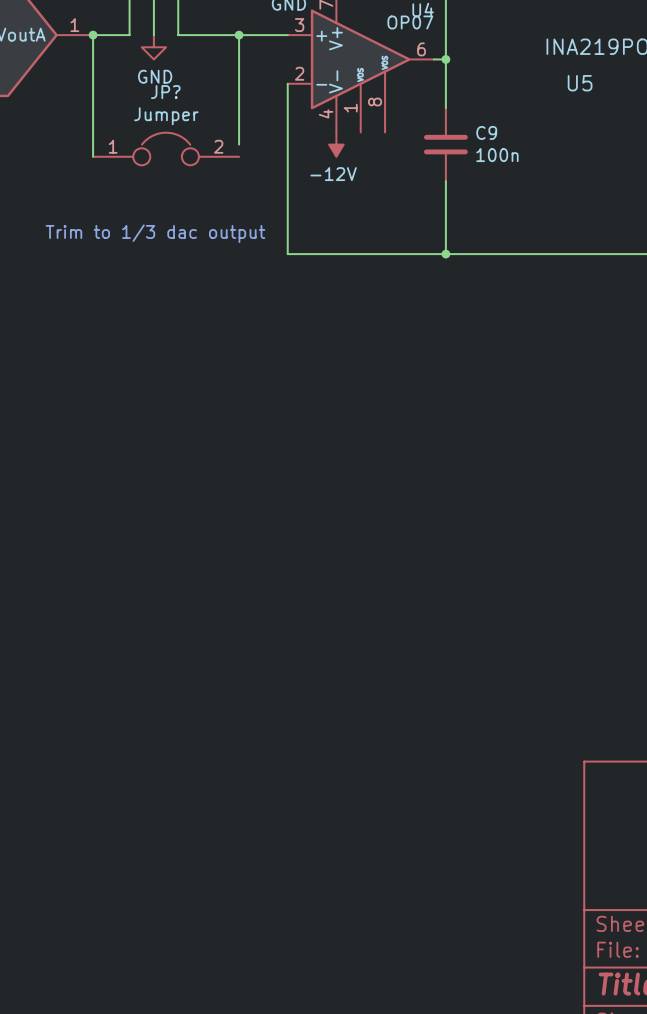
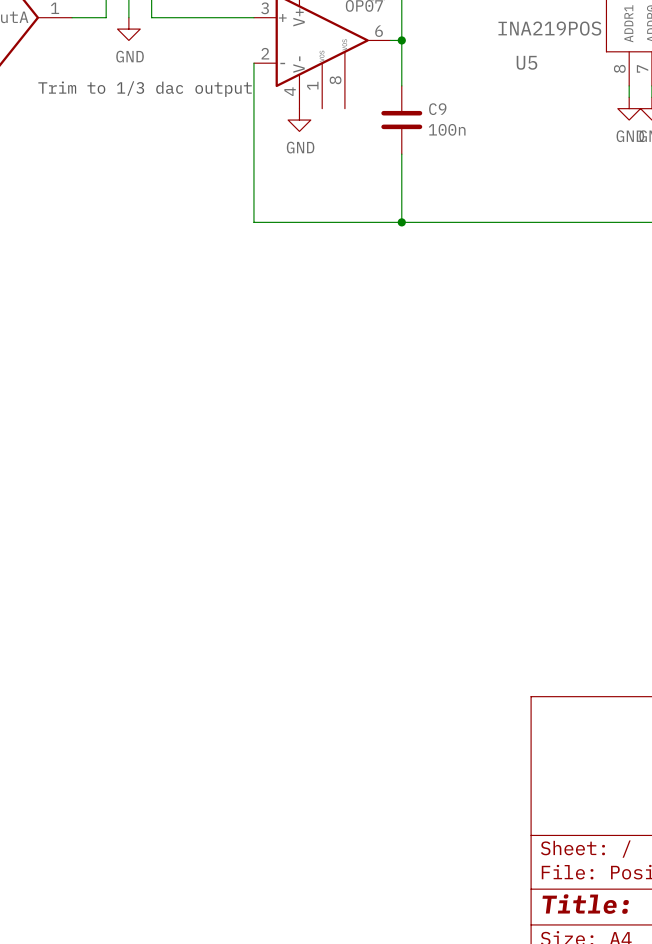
wire: (93, 35) (93, 156) -> none
junction: (93, 35) -> none
wire: (239, 35) (239, 144) -> none
junction: (239, 35) -> none
power symbol: -12V (336, 144) -> GND (299, 120)
JP?: Jumper (166, 148) -> none
text position: Trim to 1/3 dac output (155, 233) -> Trim to 1/3 dac output (145, 89)

